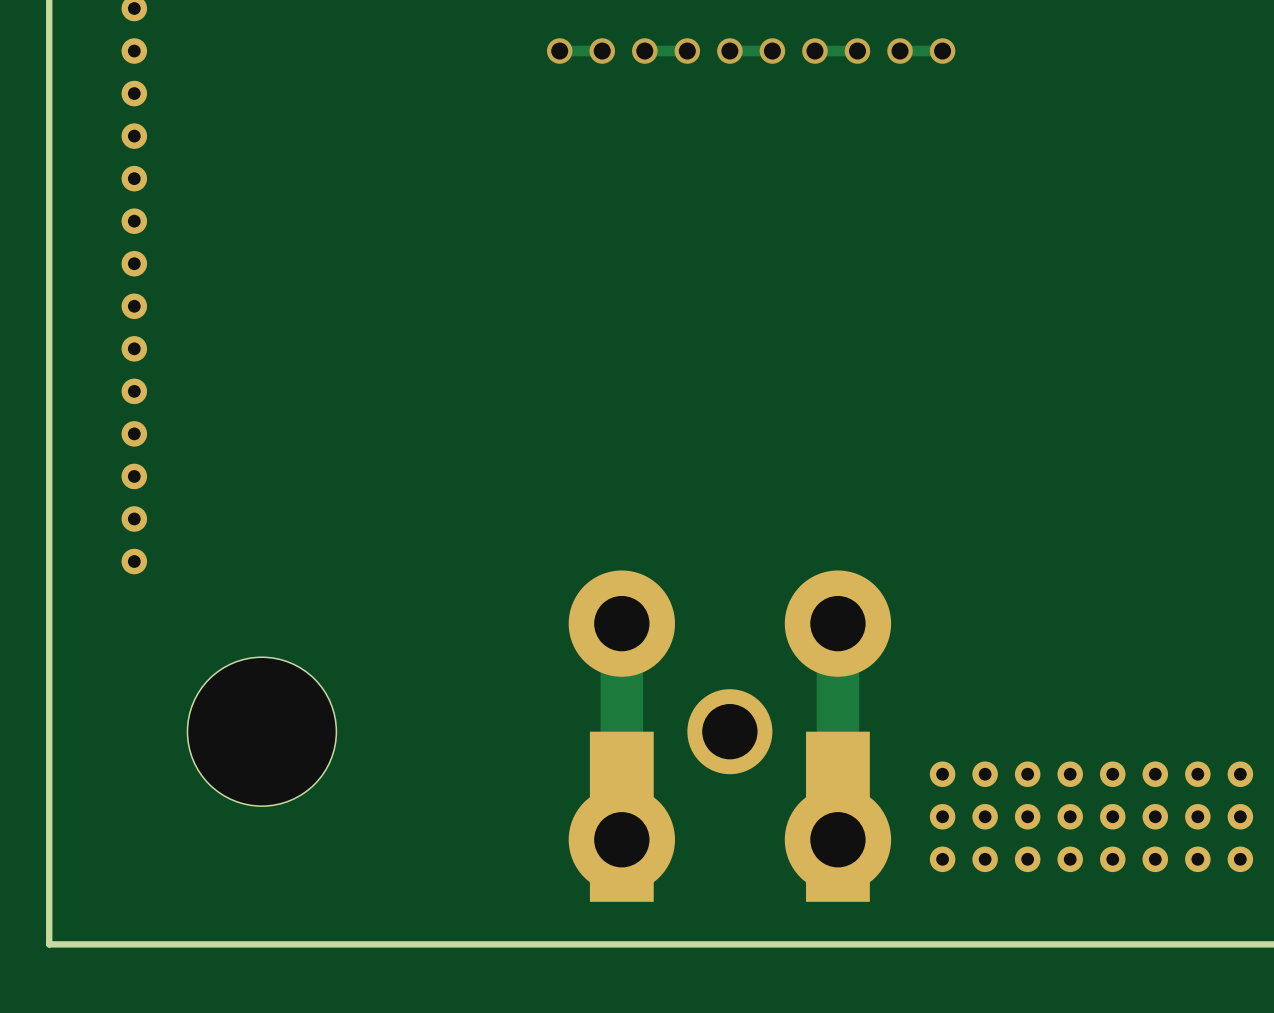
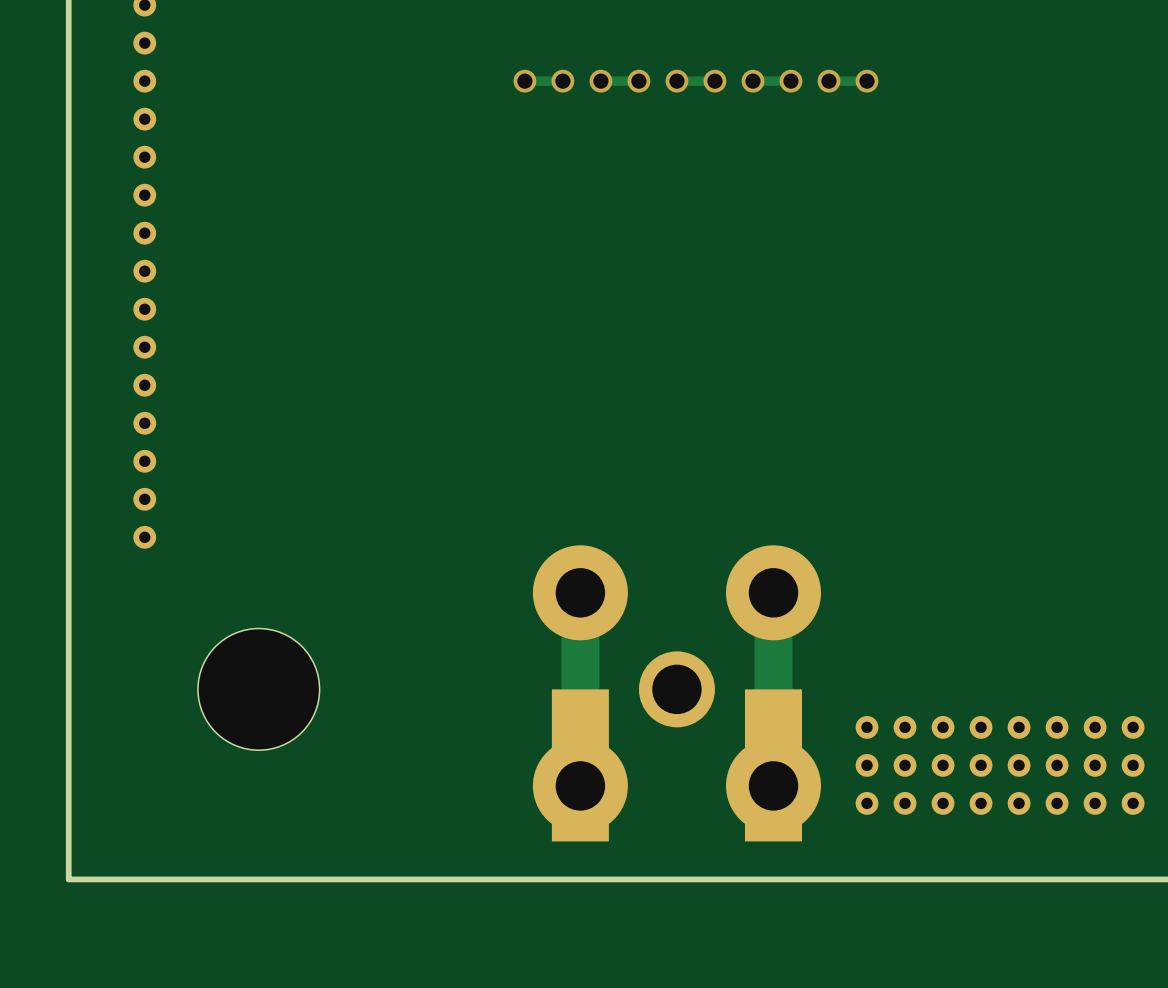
part footprint: [187, 657, 337, 807] -> [197, 628, 320, 751]

